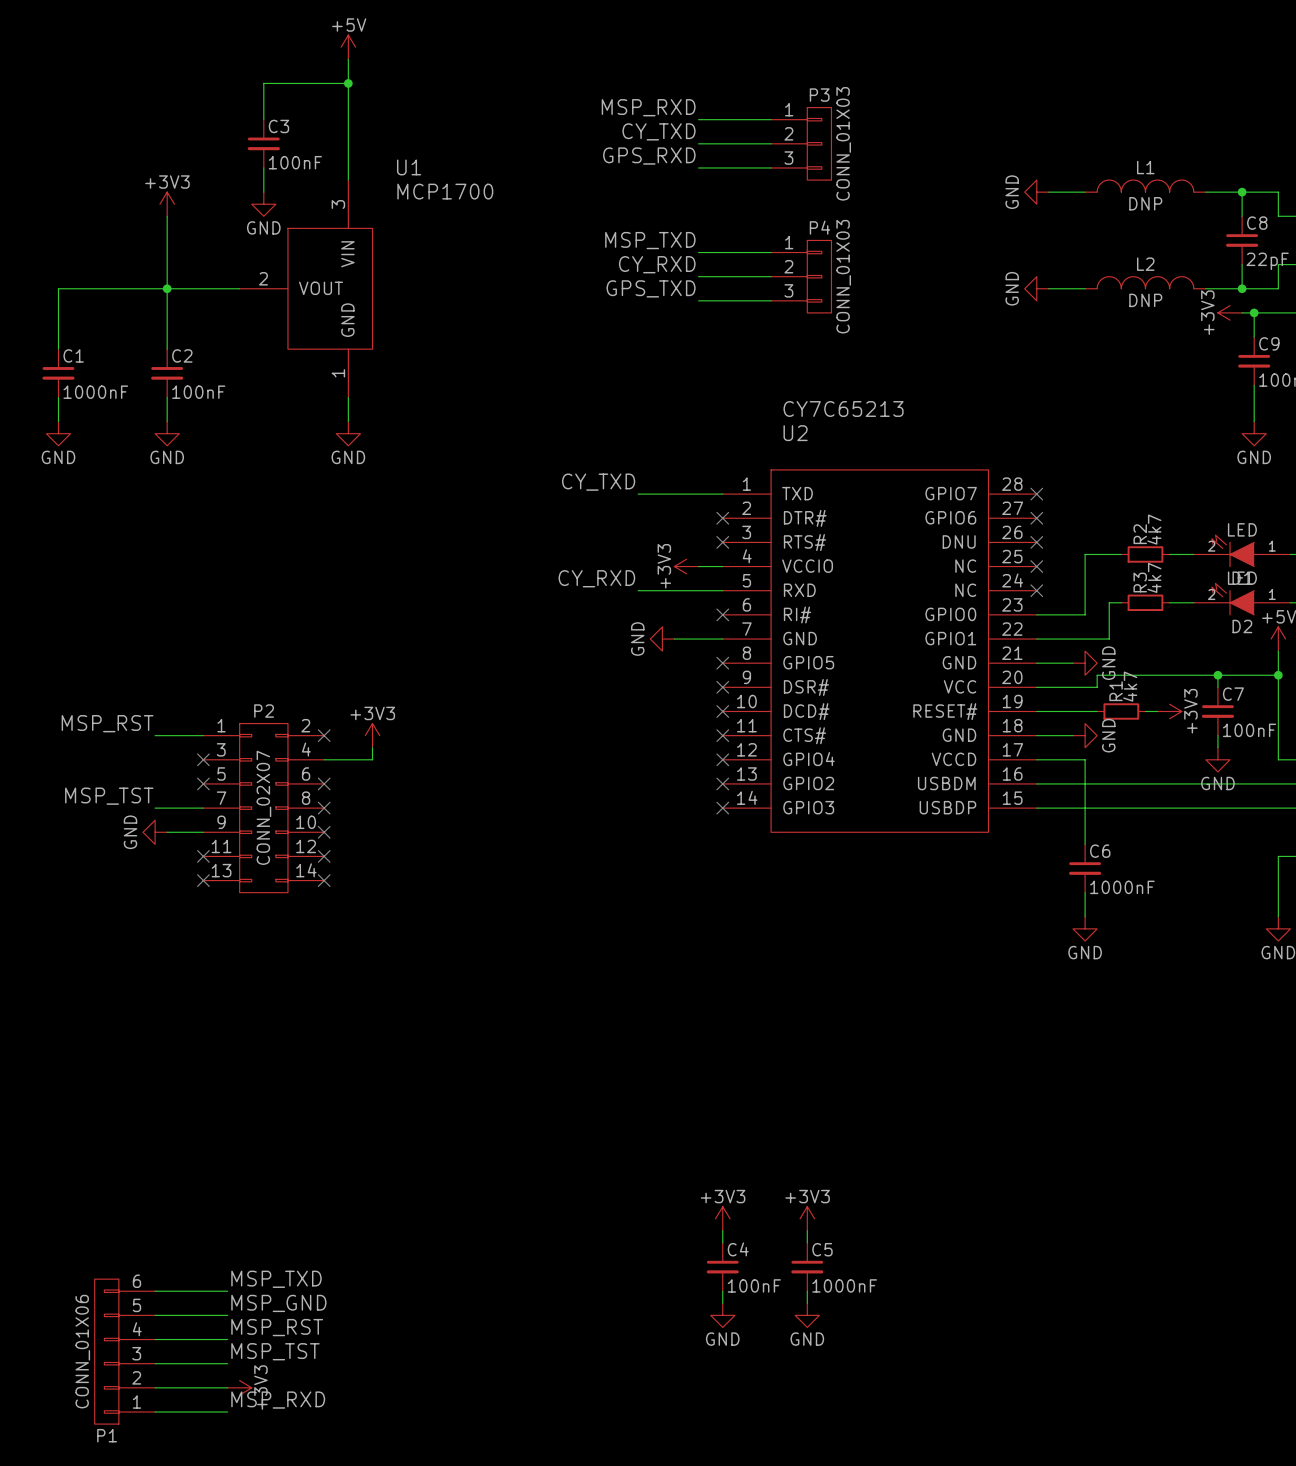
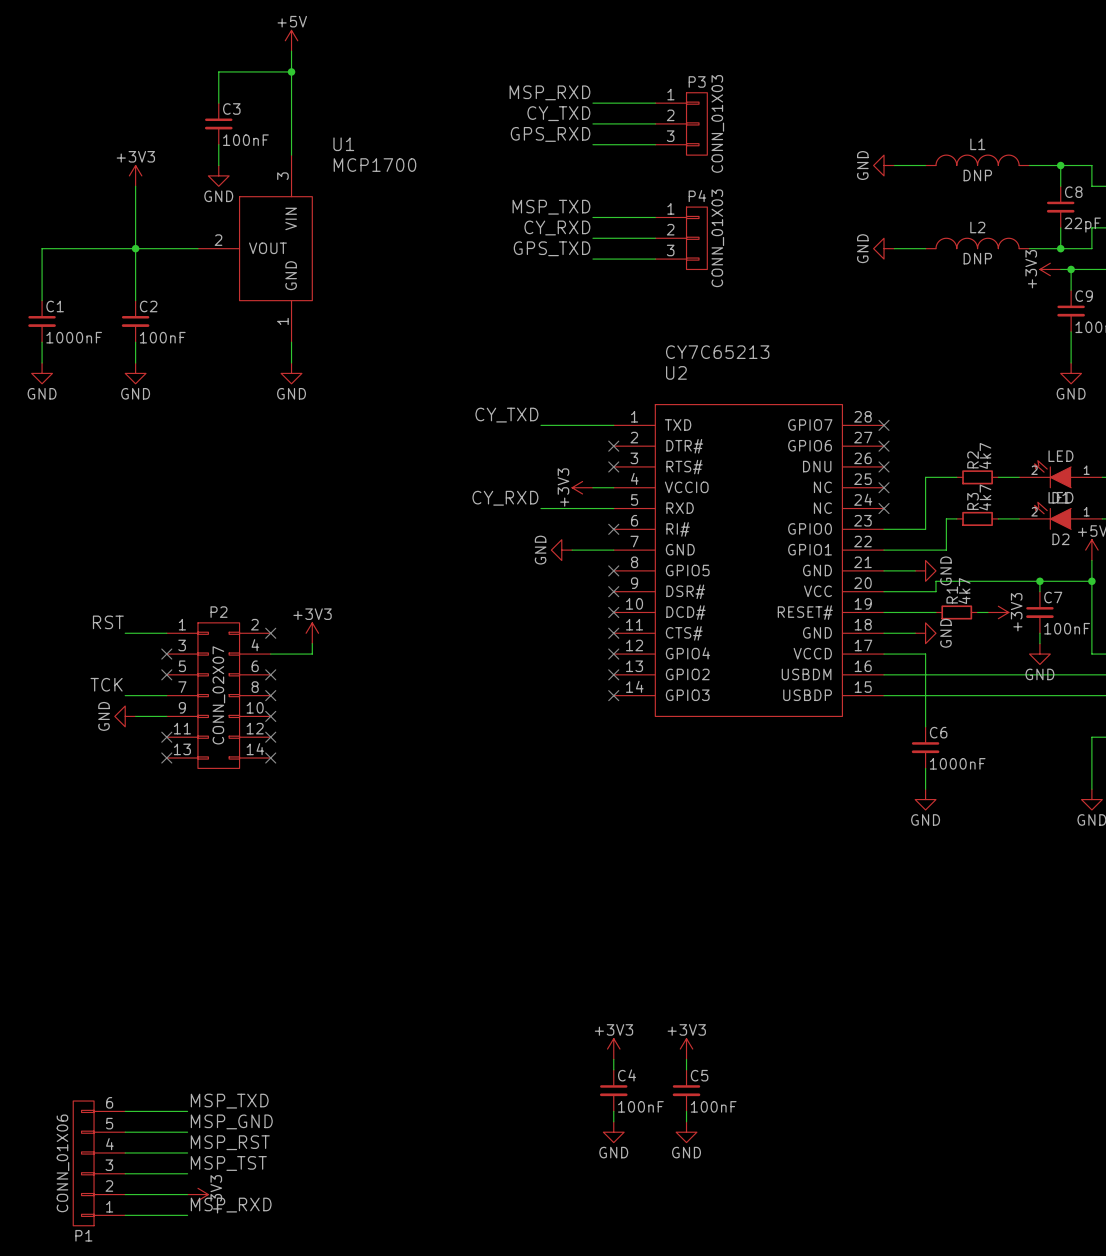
label: MSP_RST (107, 723) -> RST (108, 622)
label: MSP_TST (109, 796) -> TCK (106, 684)
C5 value: 1000nF (844, 1285) -> 100nF (713, 1106)

